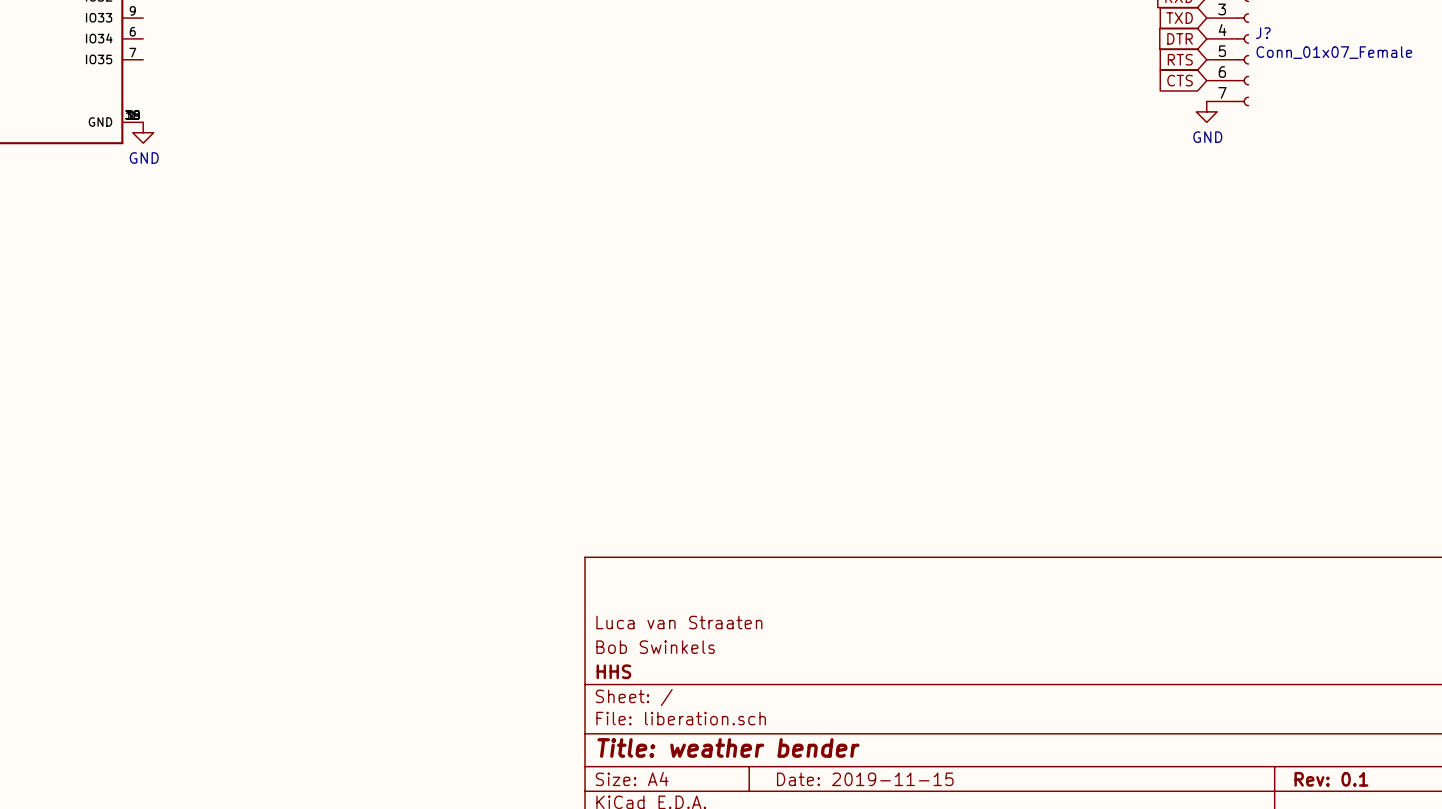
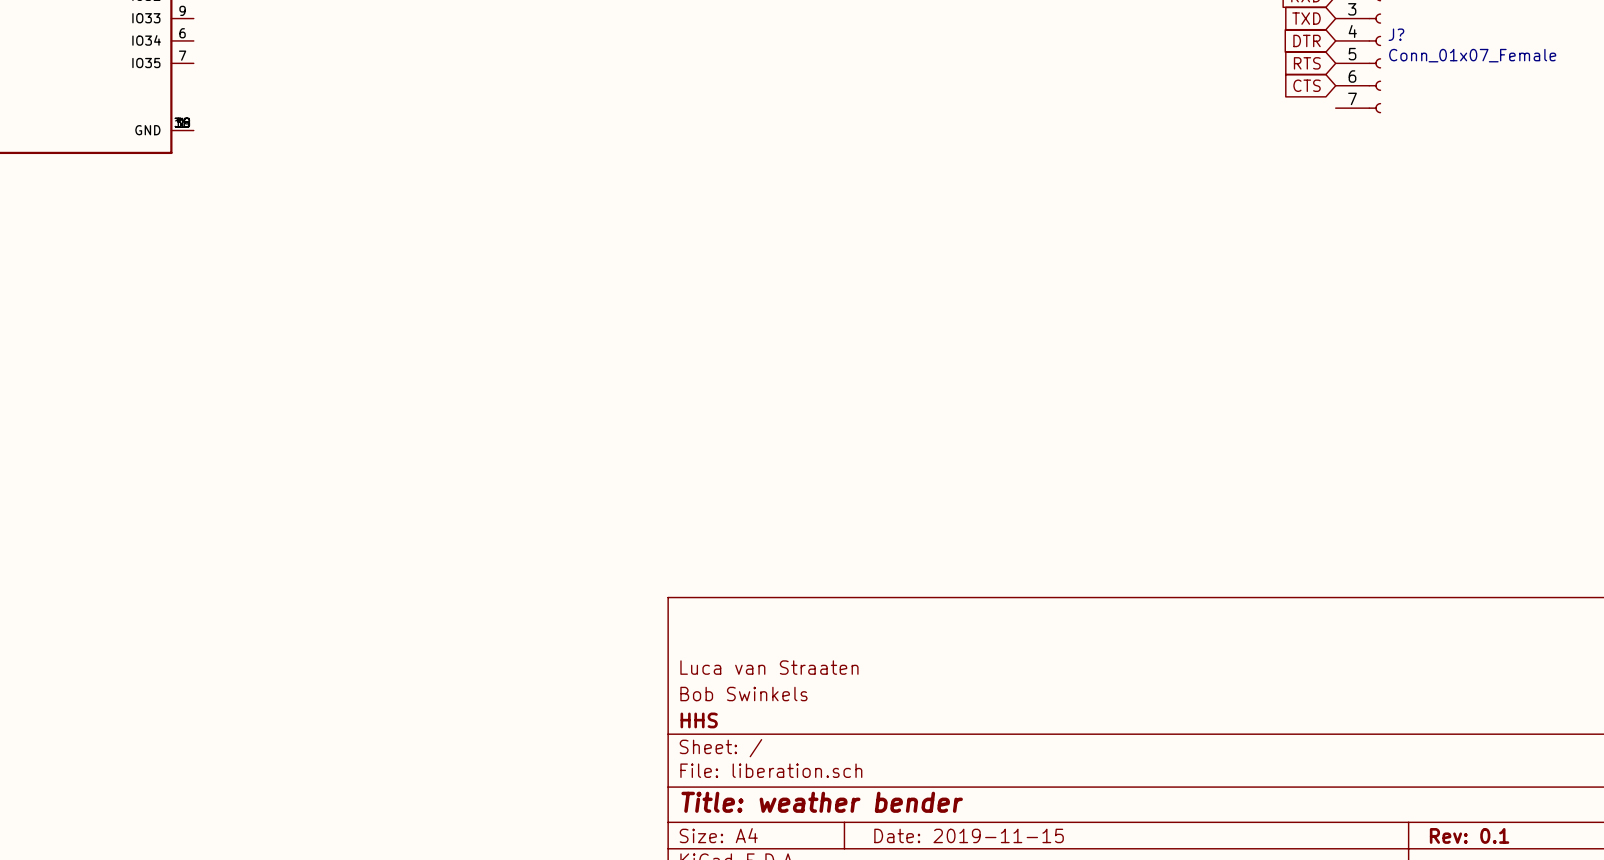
power symbol: GND (1206, 111) -> none
power symbol: GND (143, 132) -> none

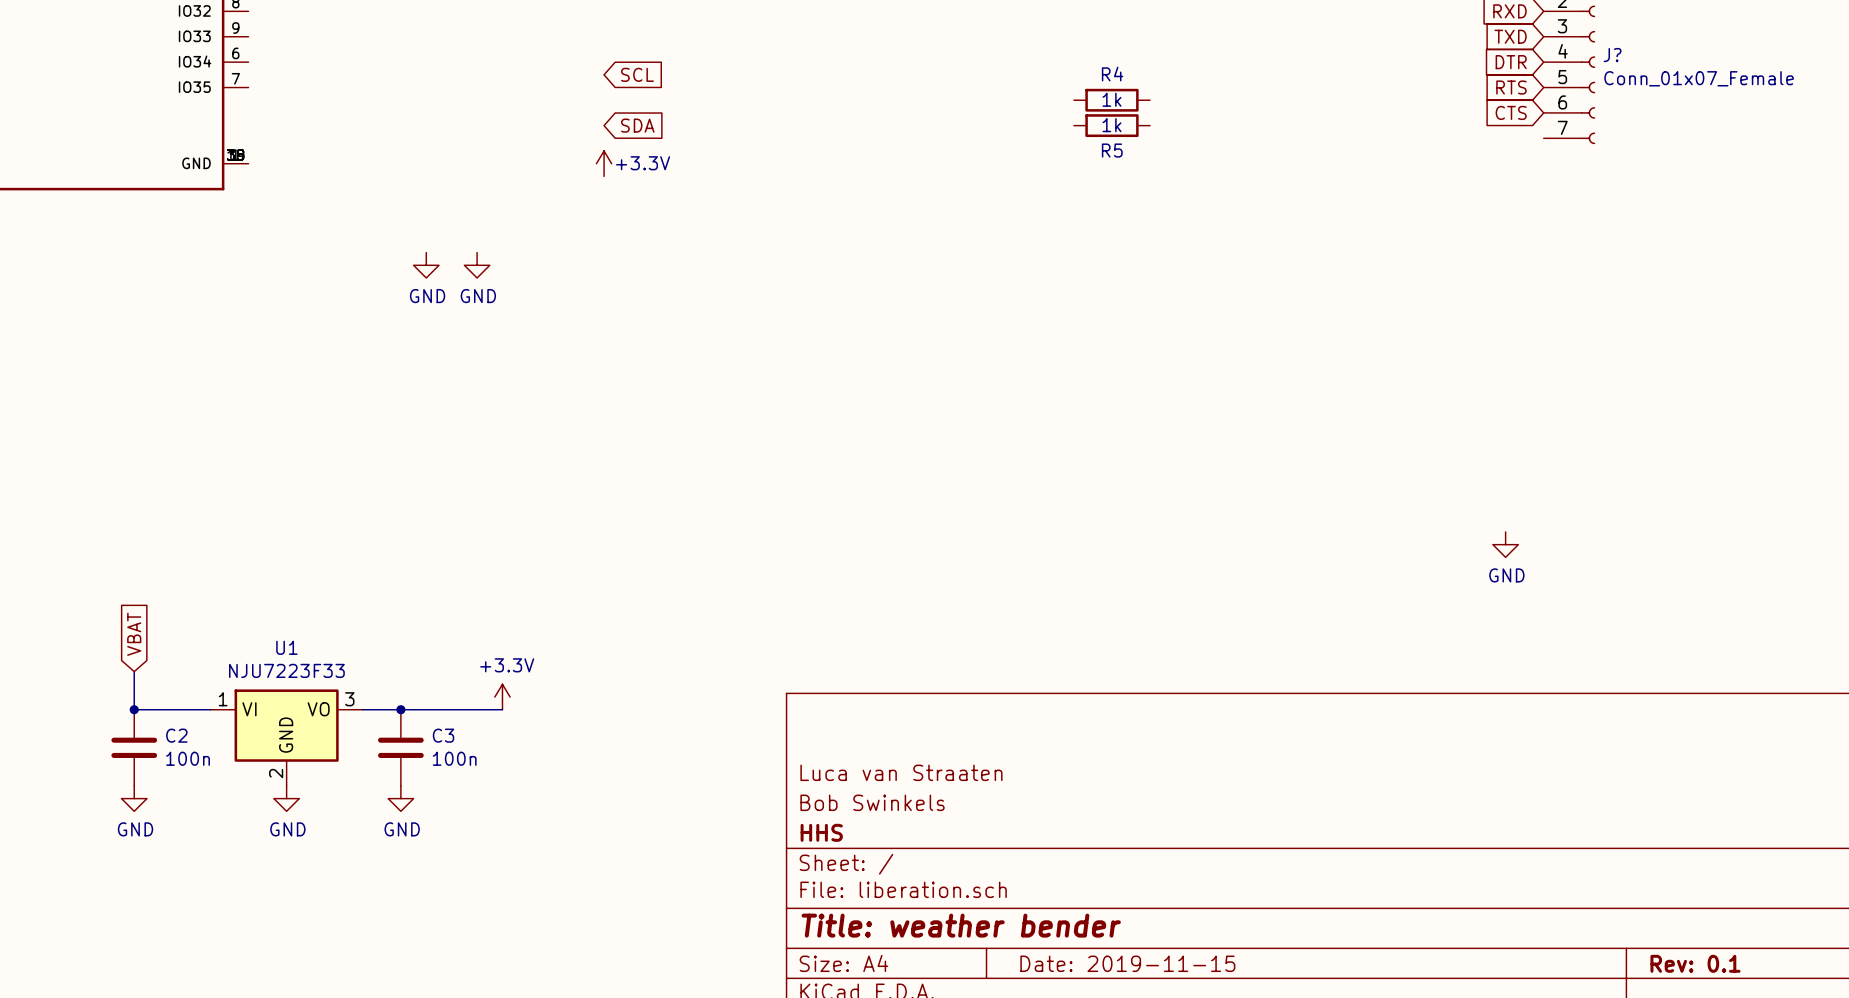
global label: none -> SCL (637, 74)
R4: none -> 1k (1111, 100)
global label: none -> SDA (637, 125)
R5: none -> 1k (1111, 125)
power symbol: none -> +3.3V (604, 163)
power symbol: none -> GND (426, 265)
power symbol: none -> GND (477, 265)
power symbol: none -> GND (1505, 544)
global label: none -> VBAT (134, 634)
wire: none -> (134, 671) (134, 709) (210, 709)
power symbol: none -> +3.3V (502, 697)
junction: none -> (134, 709)
wire: none -> (362, 709) (502, 709)
junction: none -> (400, 709)
U1: none -> NJU7223F33 (286, 737)
C2: none -> 100n (134, 747)
C3: none -> 100n (400, 747)
power symbol: none -> GND (134, 798)
power symbol: none -> GND (286, 798)
power symbol: none -> GND (400, 798)

